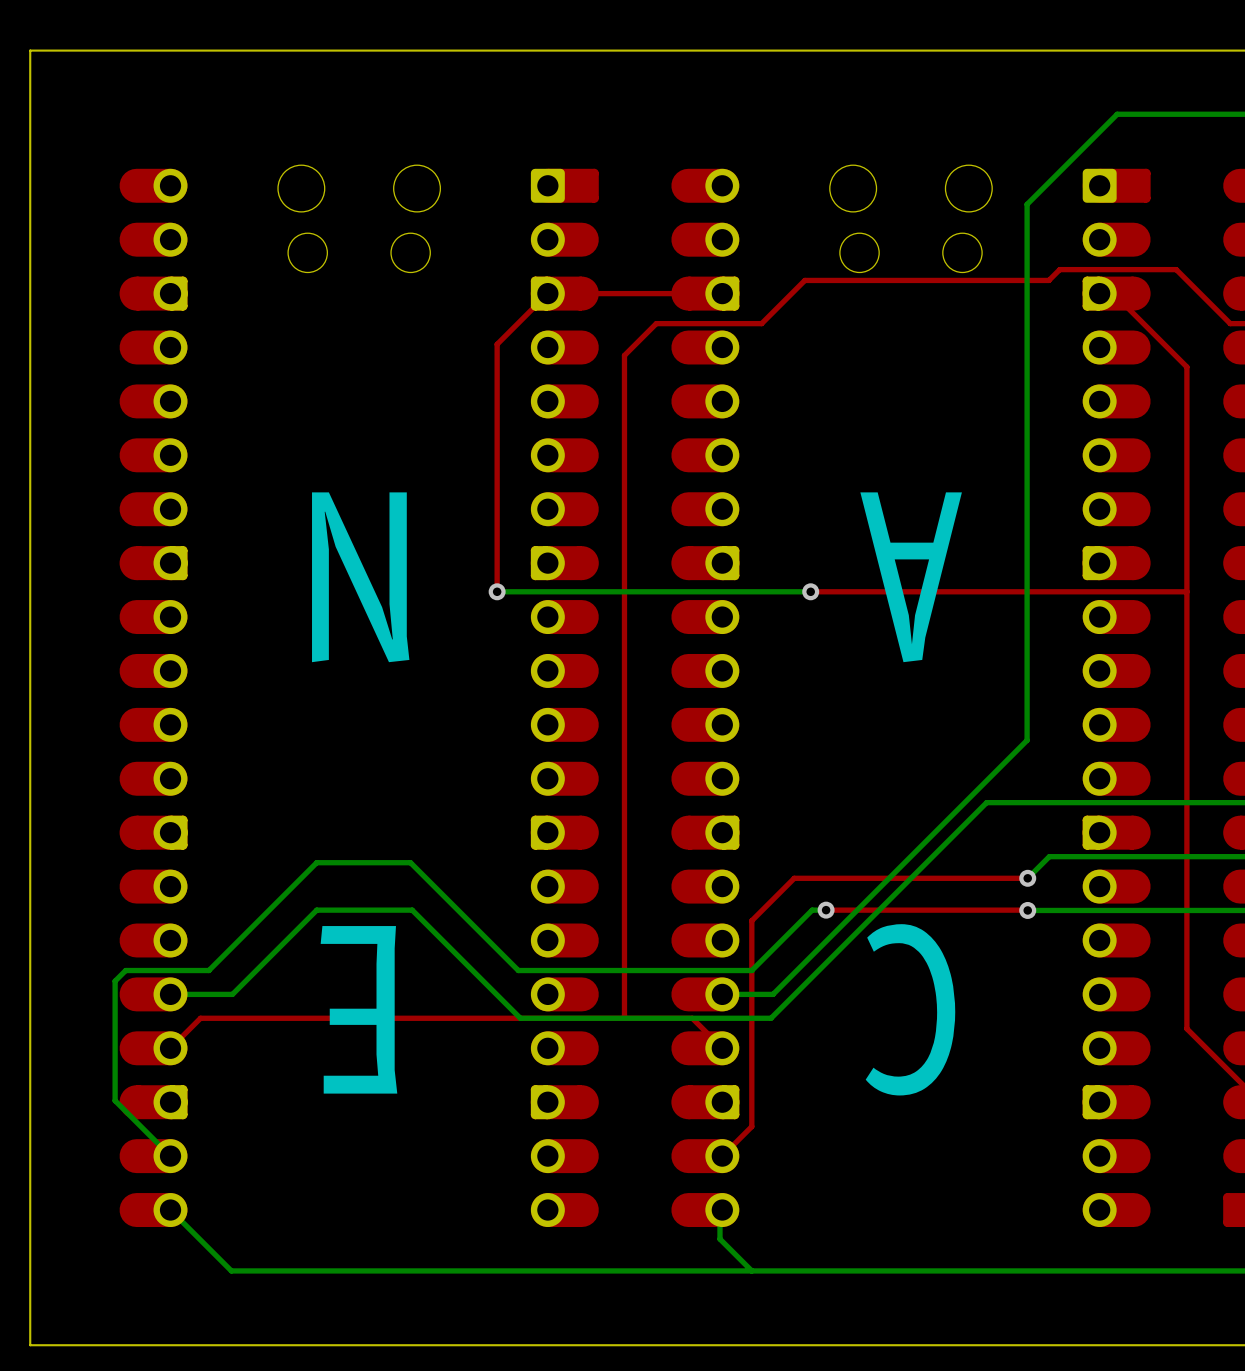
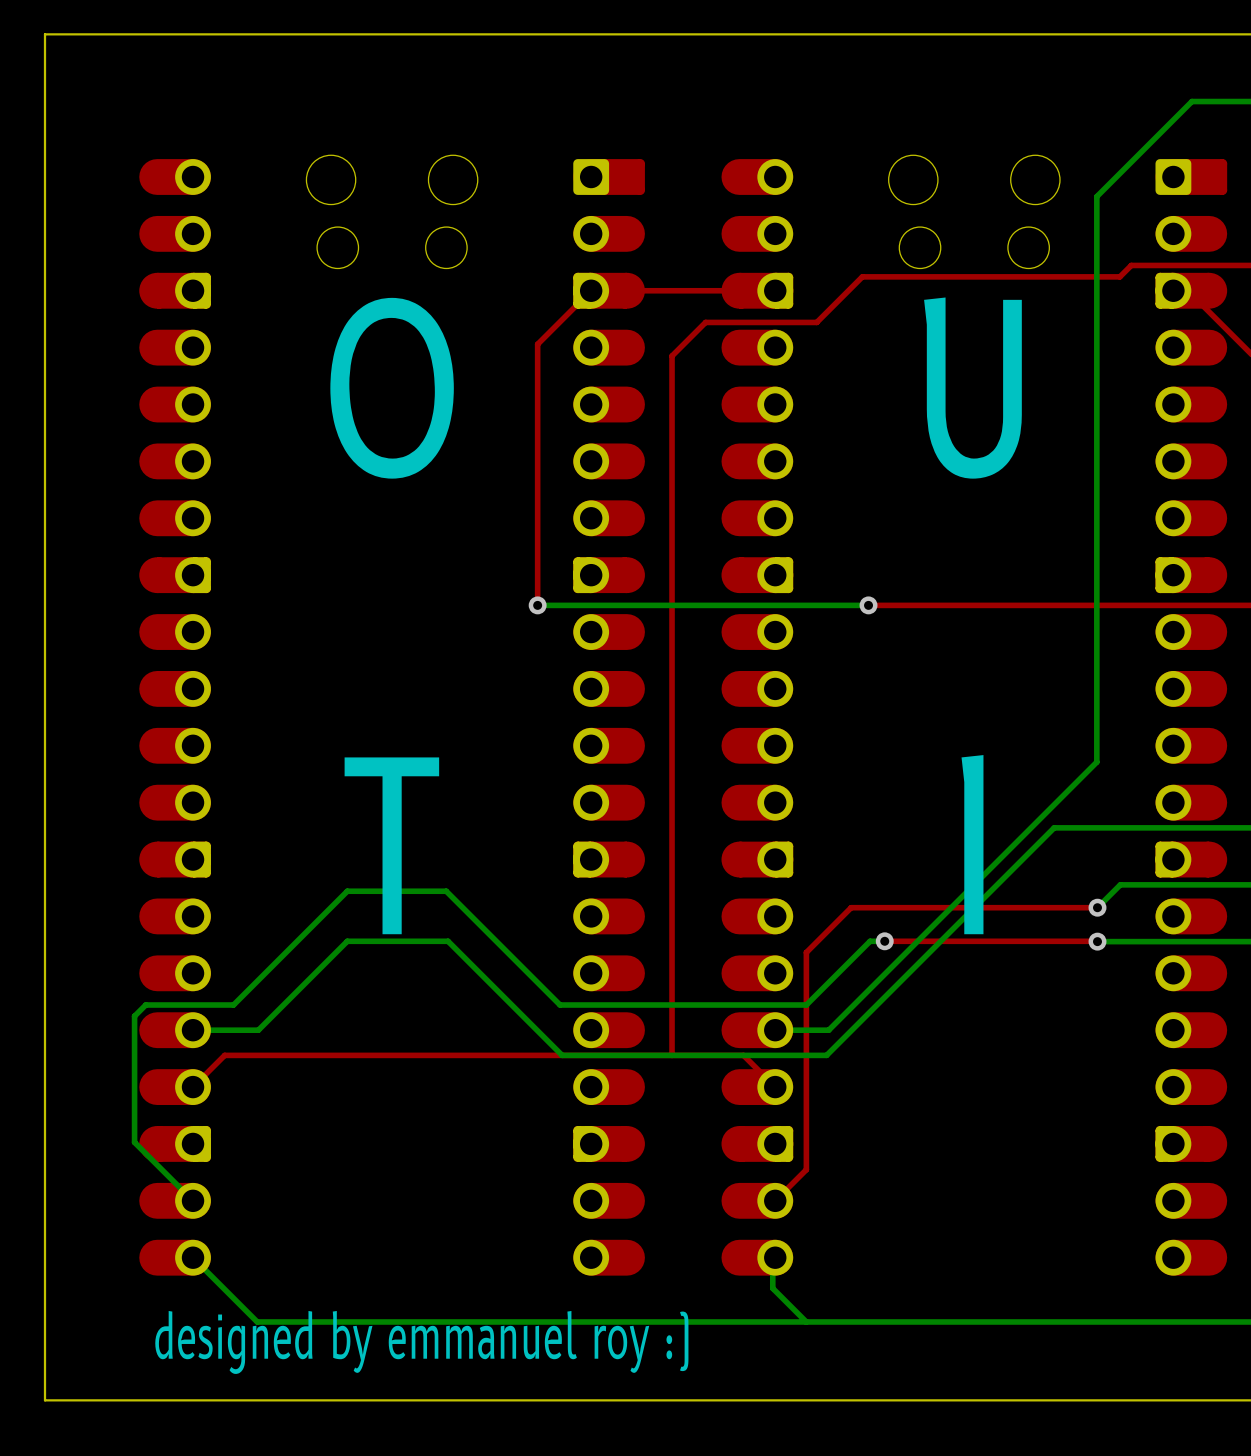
text: none -> U (972, 388)
text: none -> O (392, 388)
text: N (360, 577) -> none
text: A (911, 577) -> none
text: none -> I (972, 844)
text: none -> T (391, 845)
text: E (358, 1009) -> none
text: C (910, 1009) -> none
text: none -> designed by emmanuel roy :) (421, 1342)

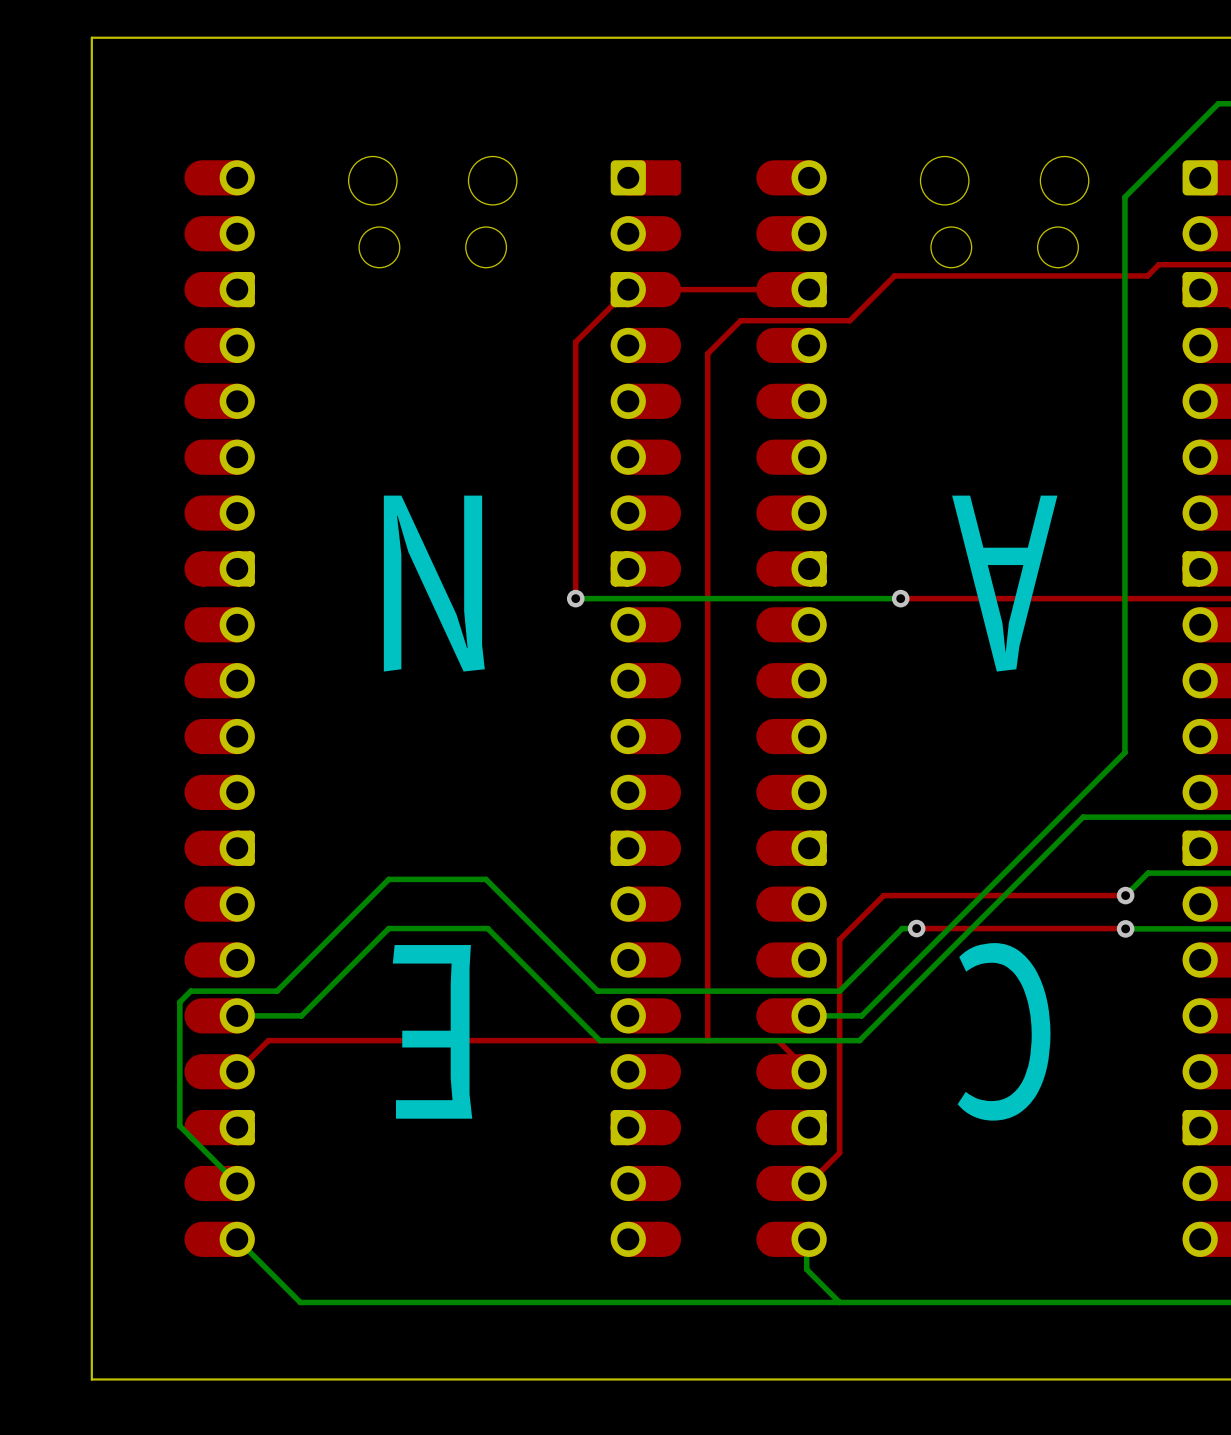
text: O (392, 388) -> none
text: U (972, 388) -> none
text: none -> N (434, 583)
text: none -> A (1004, 583)
text: I (972, 844) -> none
text: T (391, 845) -> none
text: none -> E (432, 1031)
text: none -> C (1004, 1031)
text: designed by emmanuel roy :) (421, 1342) -> none

